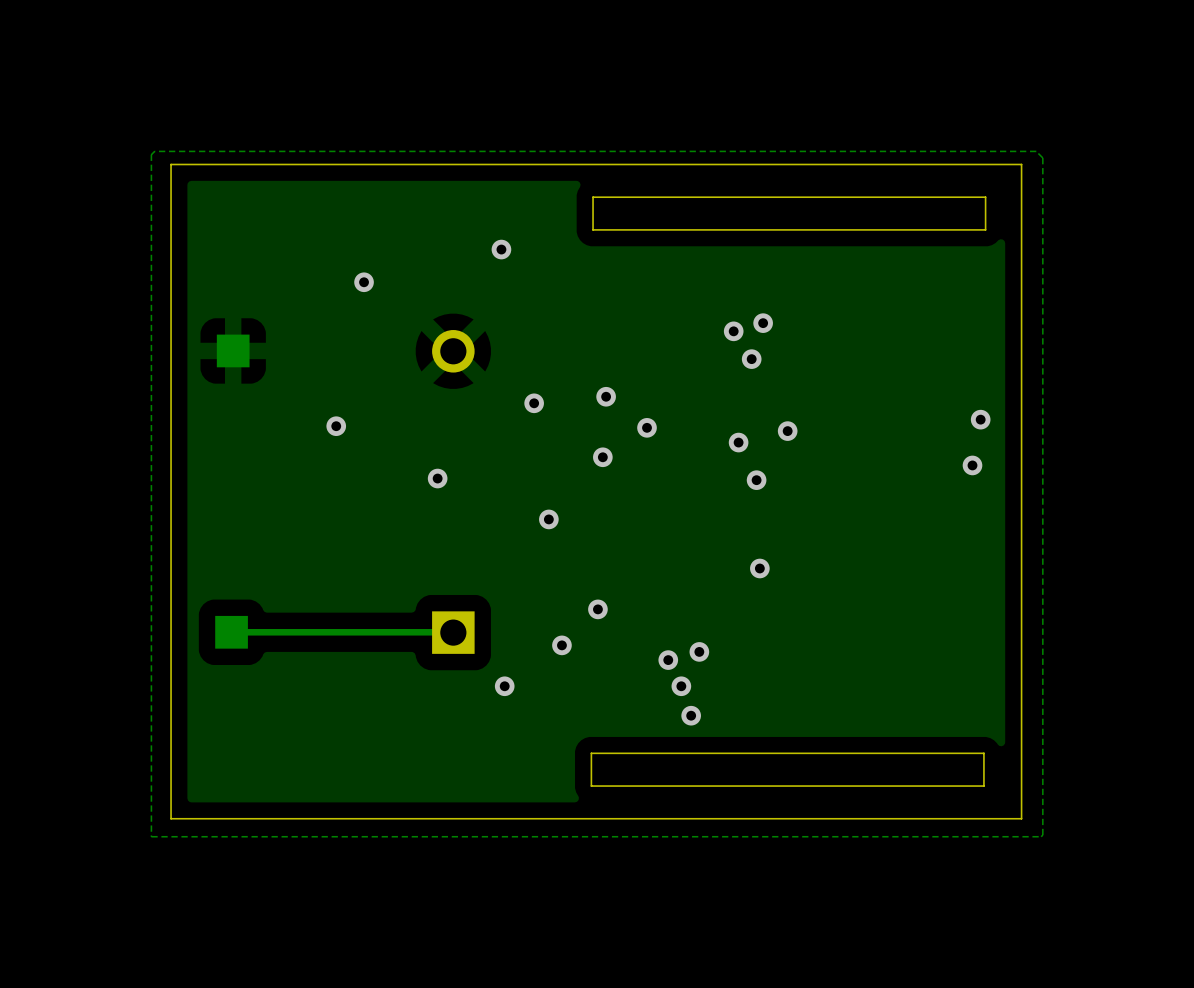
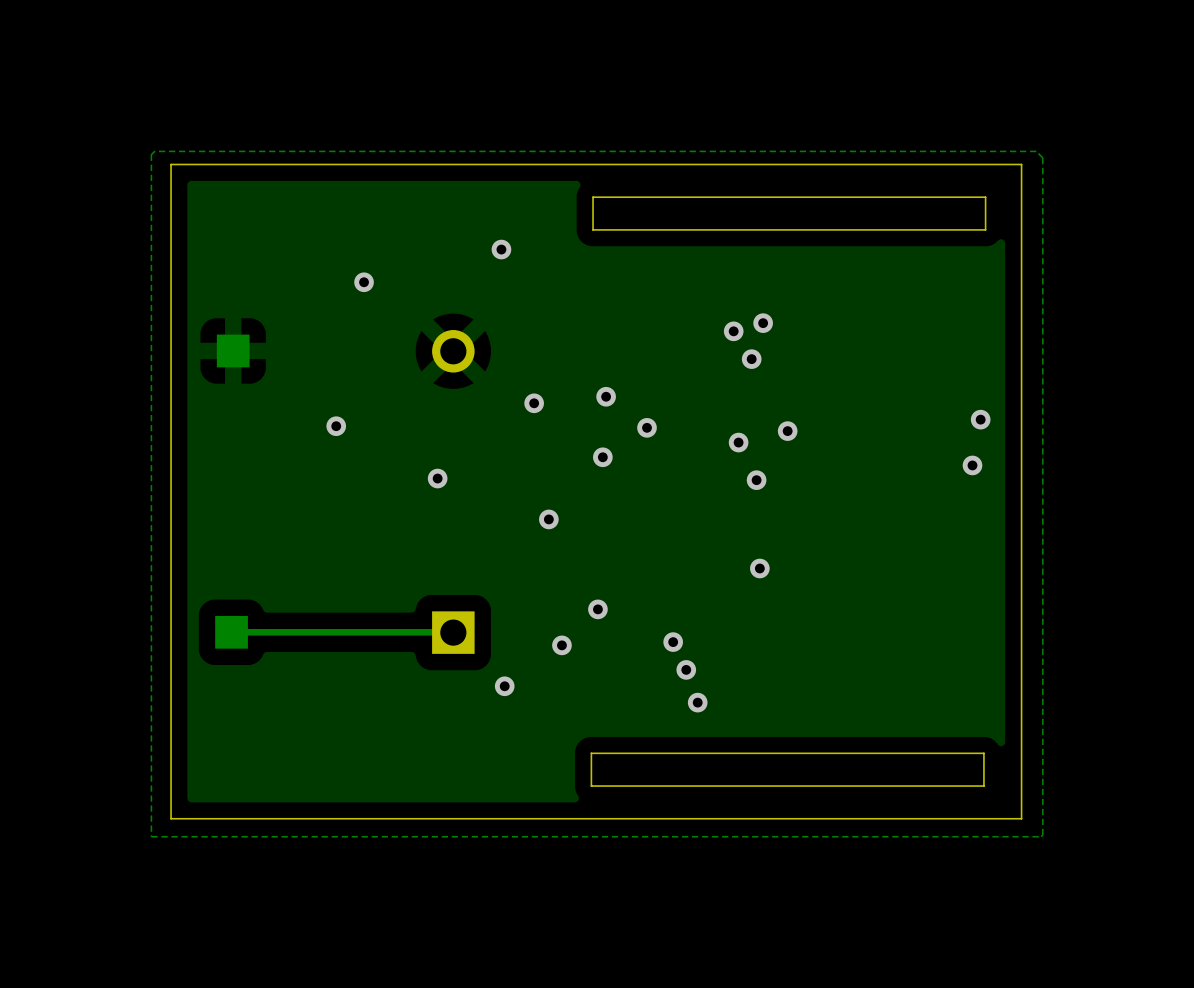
via: none -> (673, 642)
via: (699, 651) -> none
via: (668, 660) -> none
via: none -> (686, 669)
via: (681, 686) -> none
via: none -> (697, 702)
via: (691, 715) -> none

